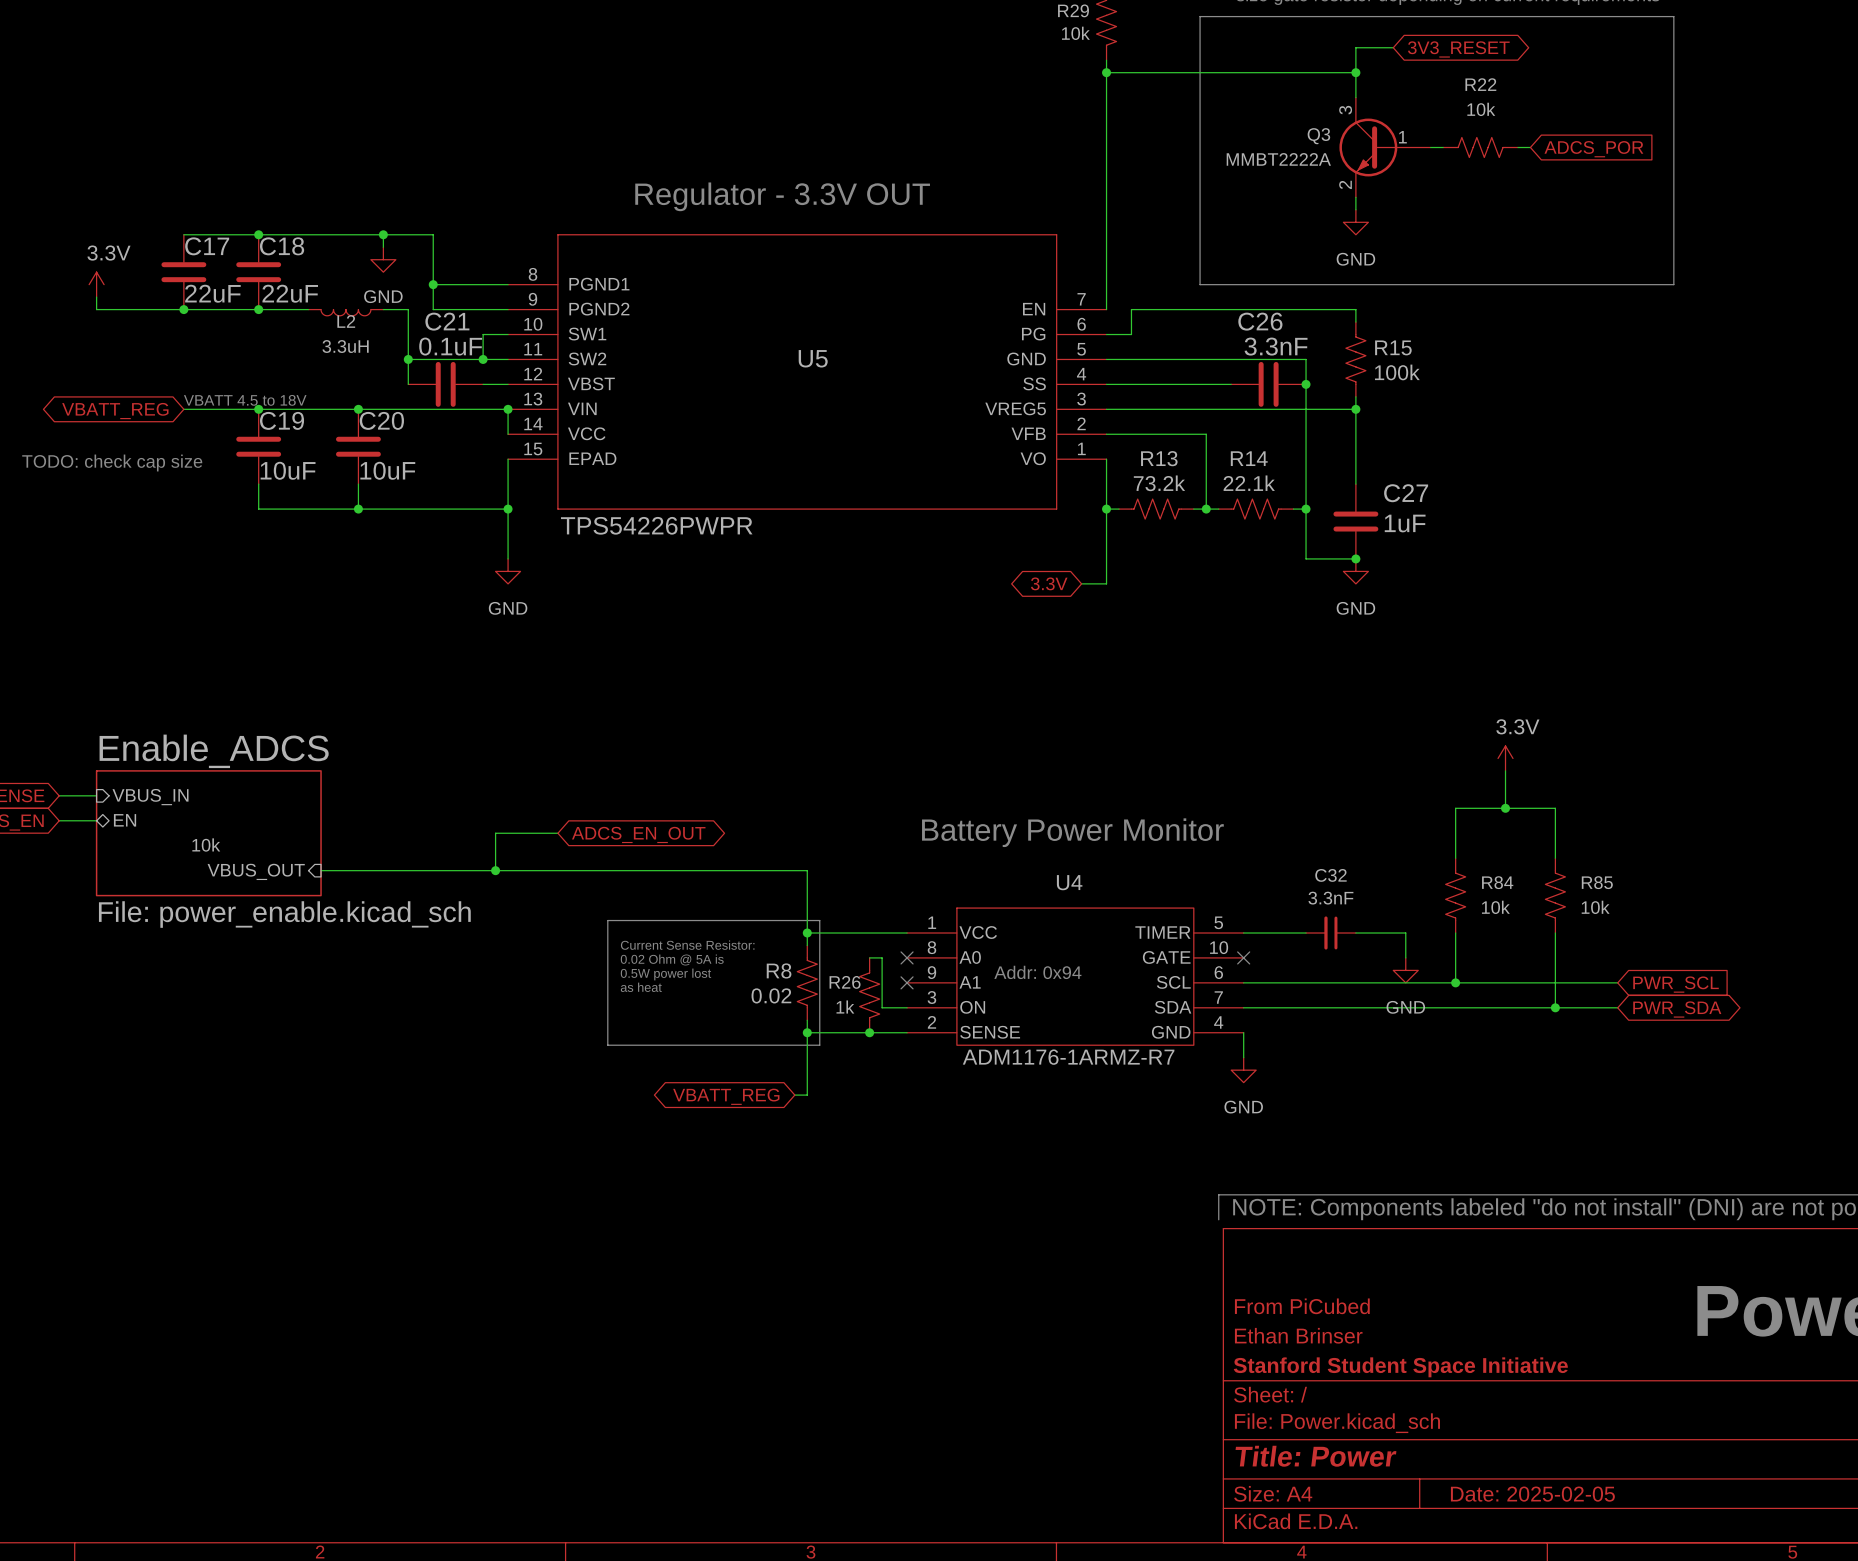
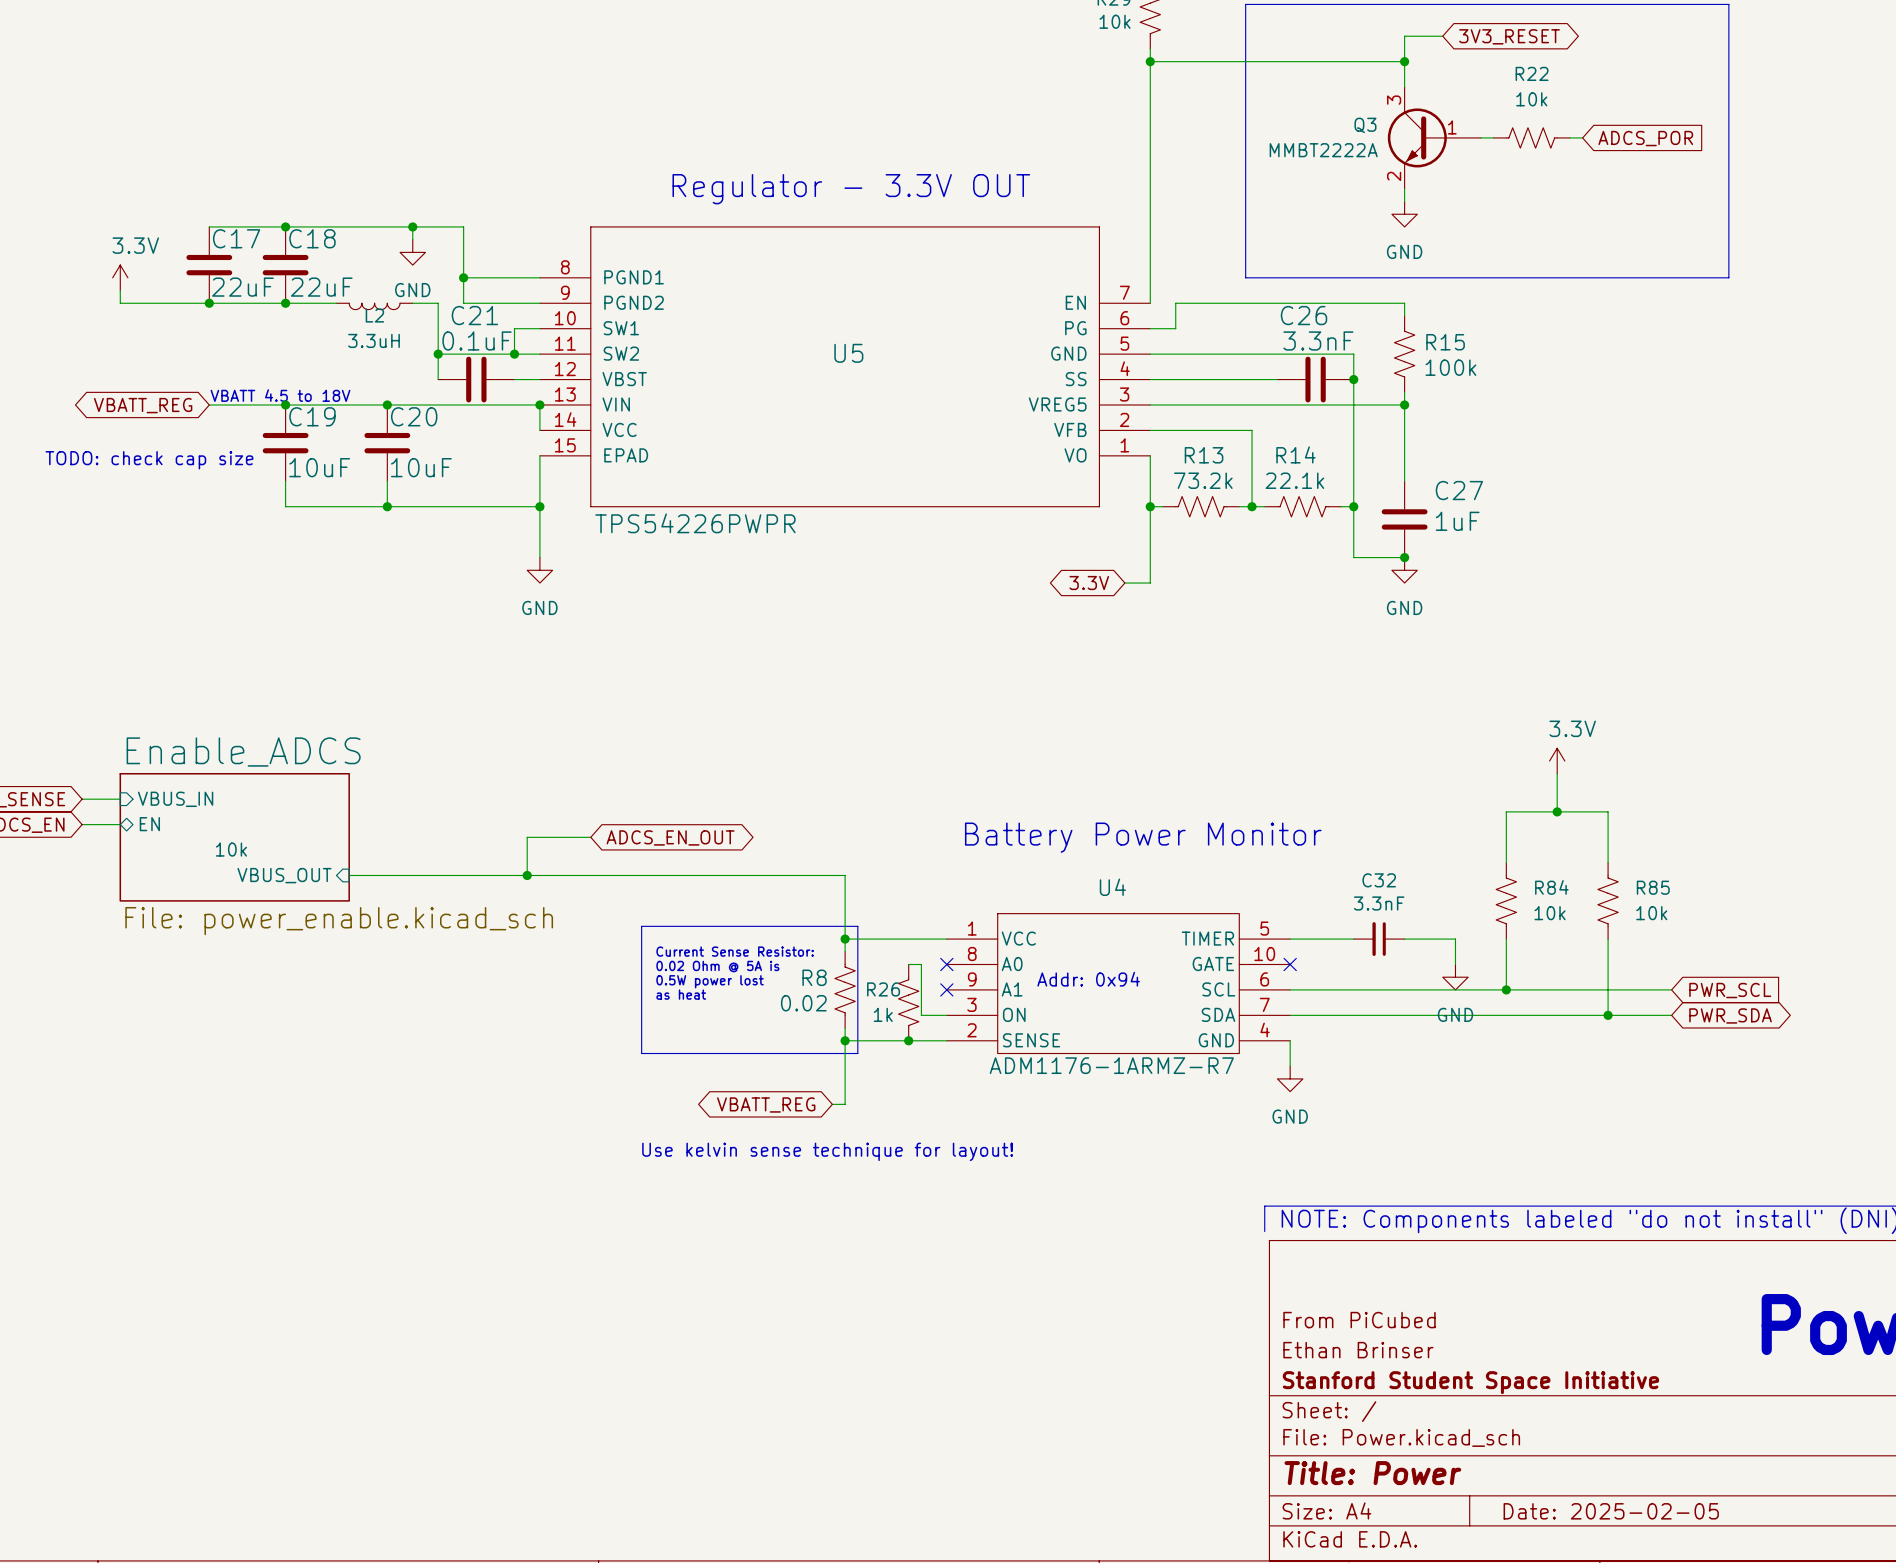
text: none -> Use kelvin sense technique for layout! (827, 1151)

